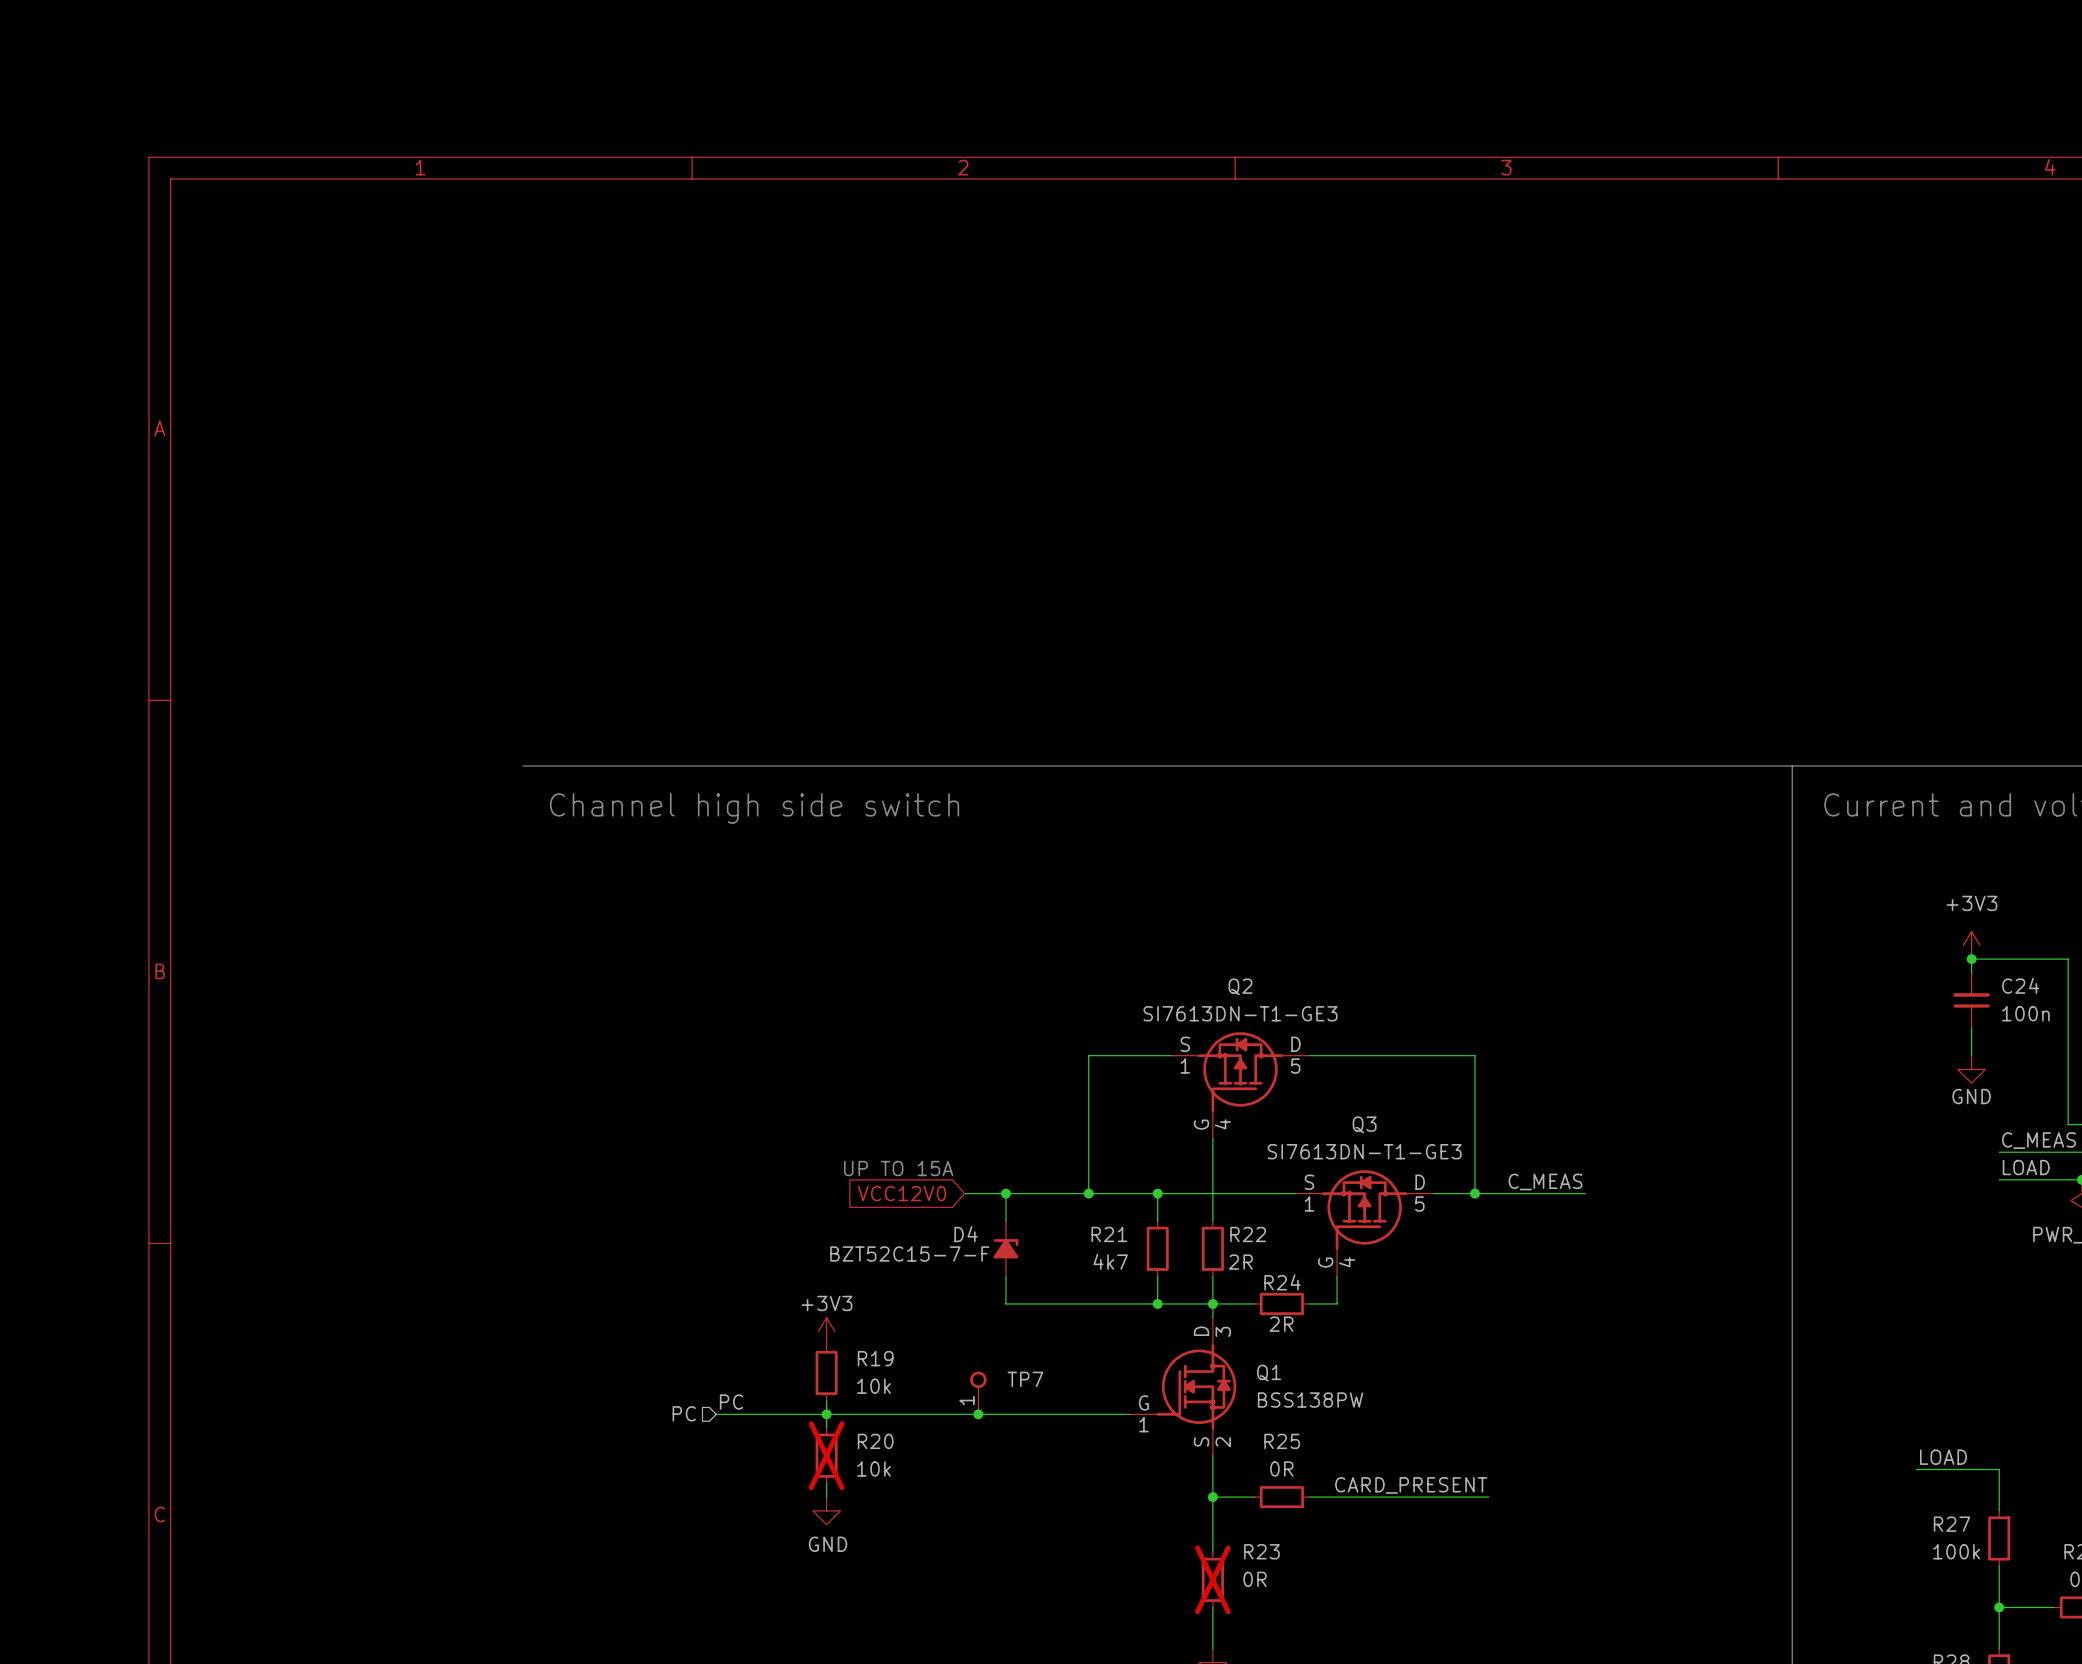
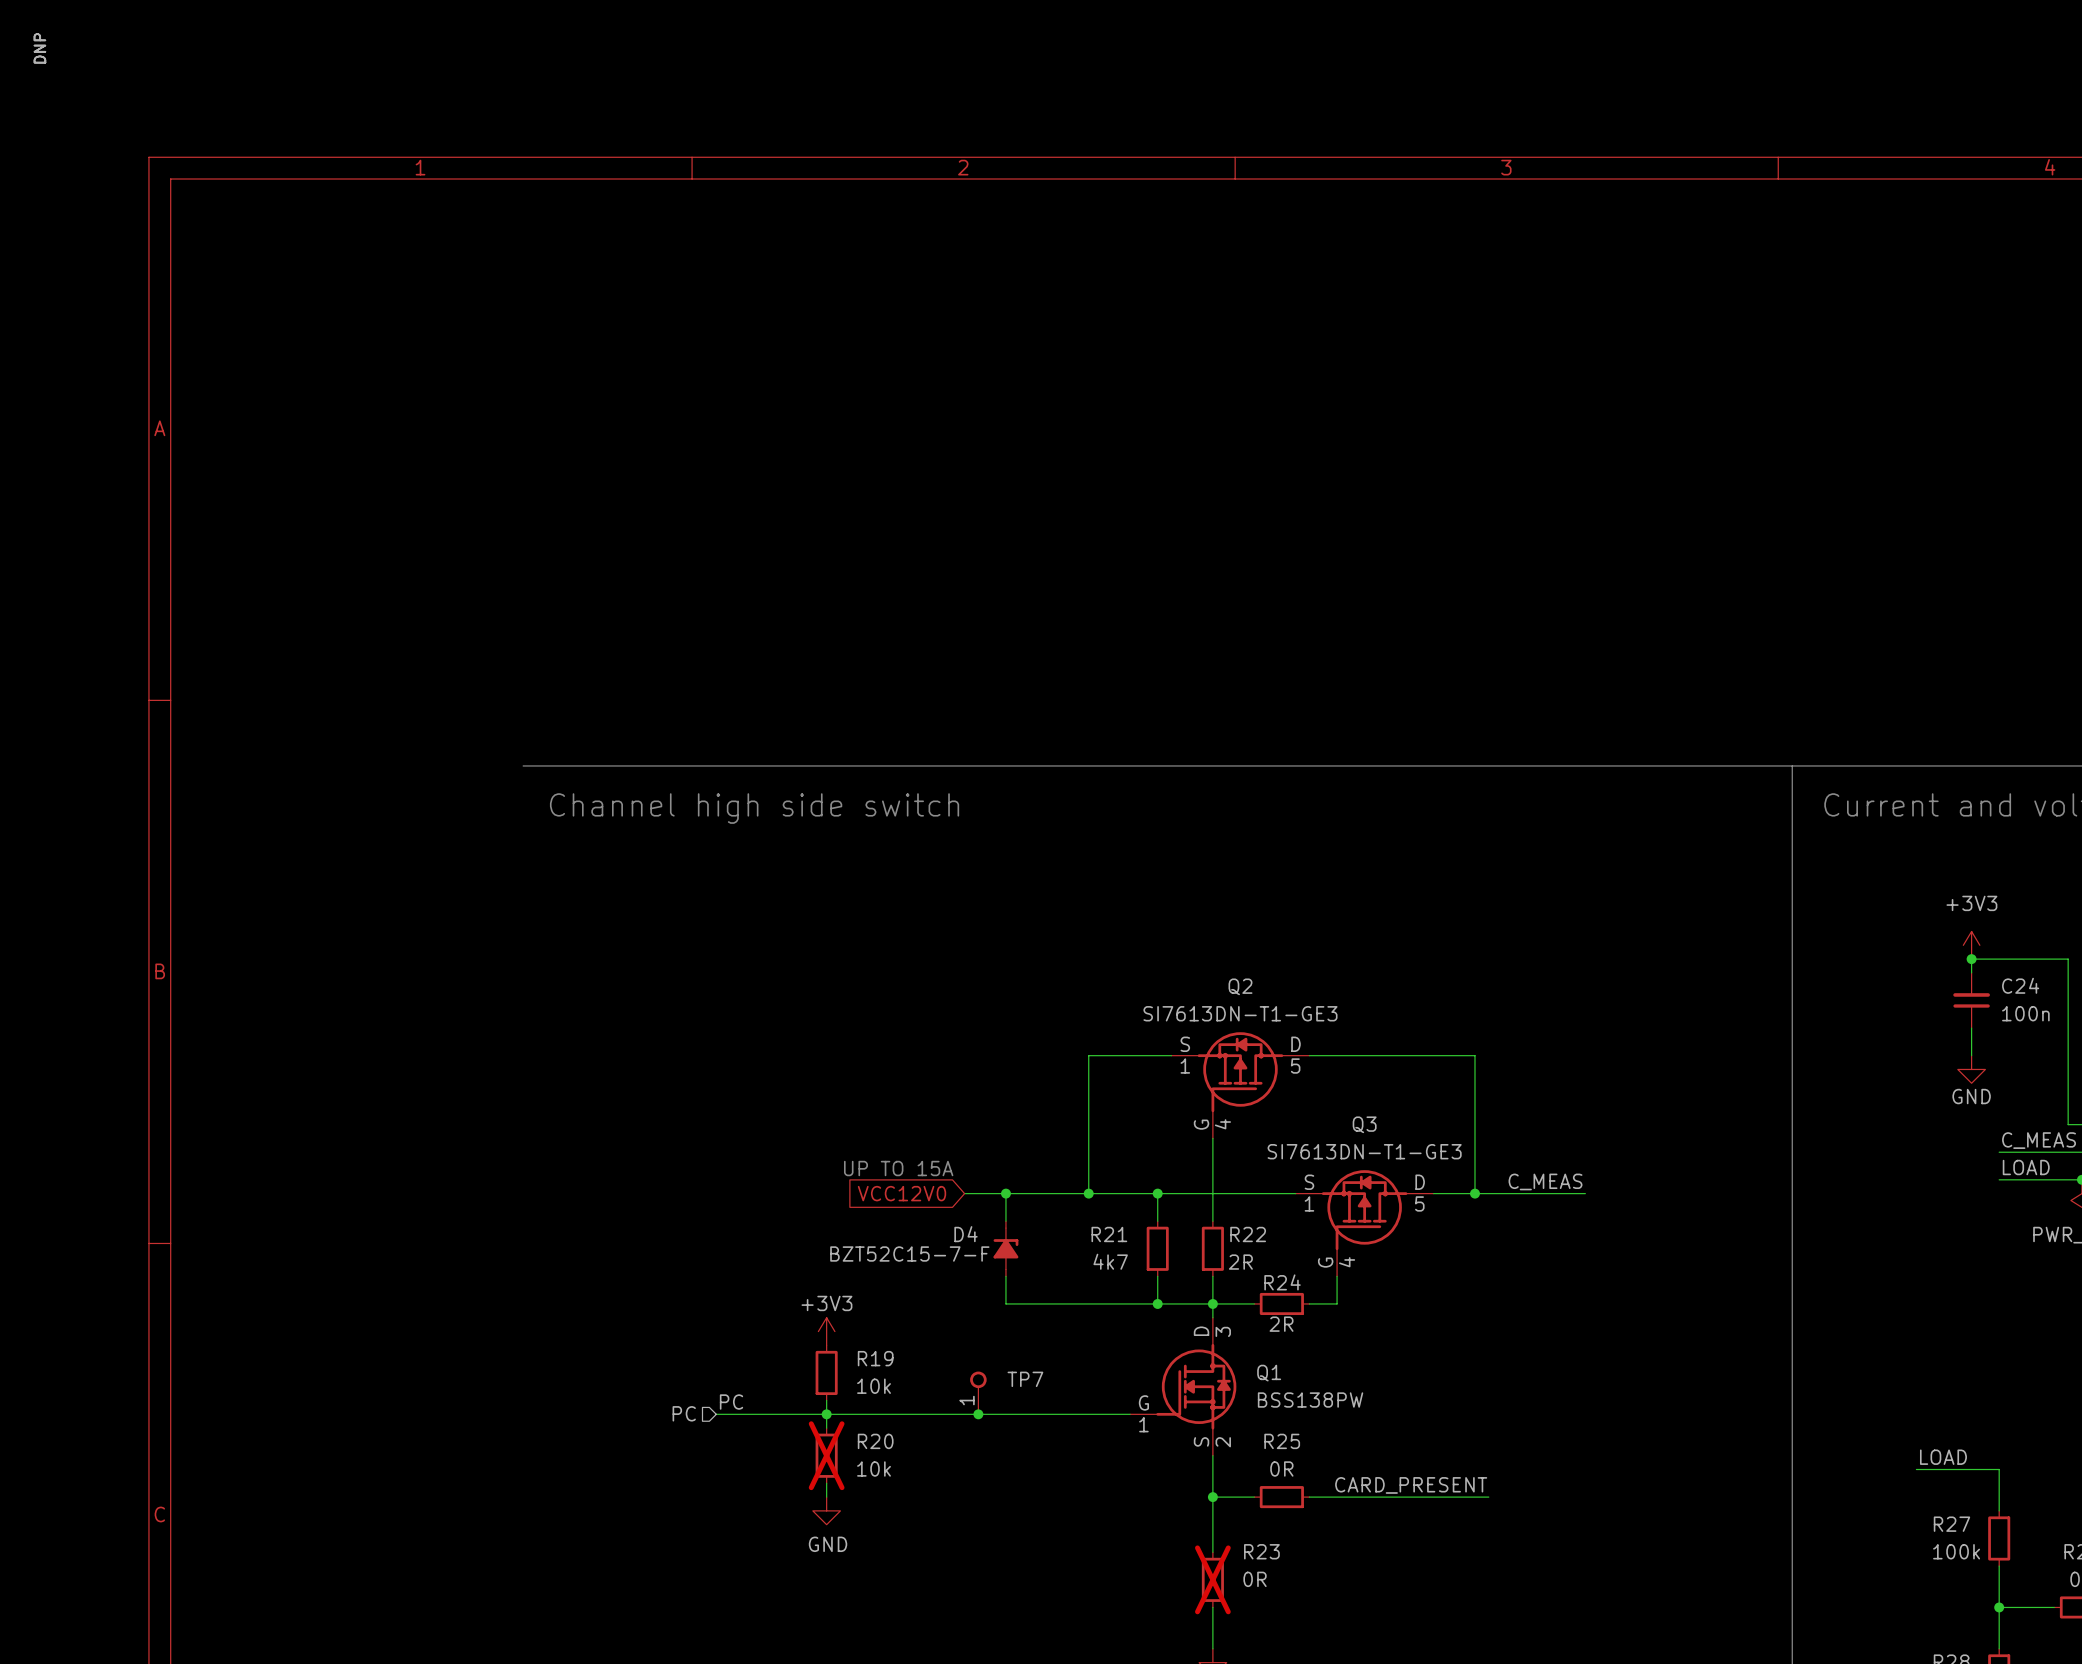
R20 text: none -> DNP (39, 48)
R23 text: none -> DNP (39, 48)

